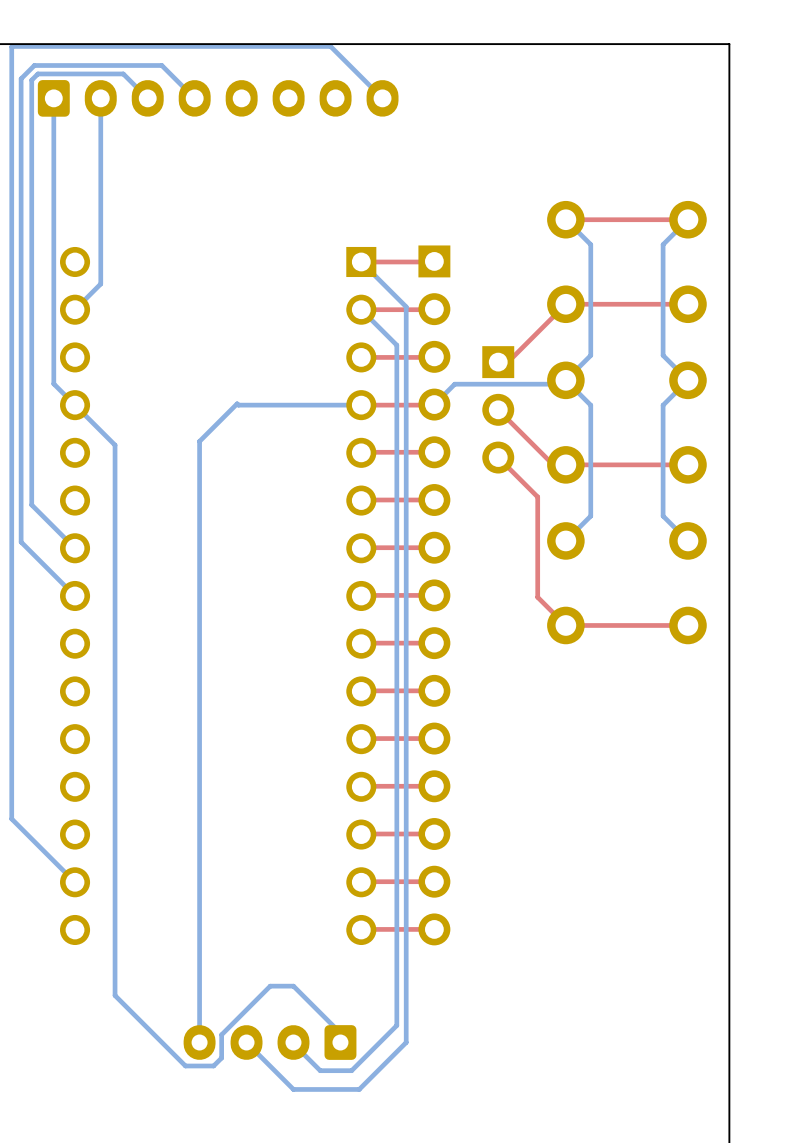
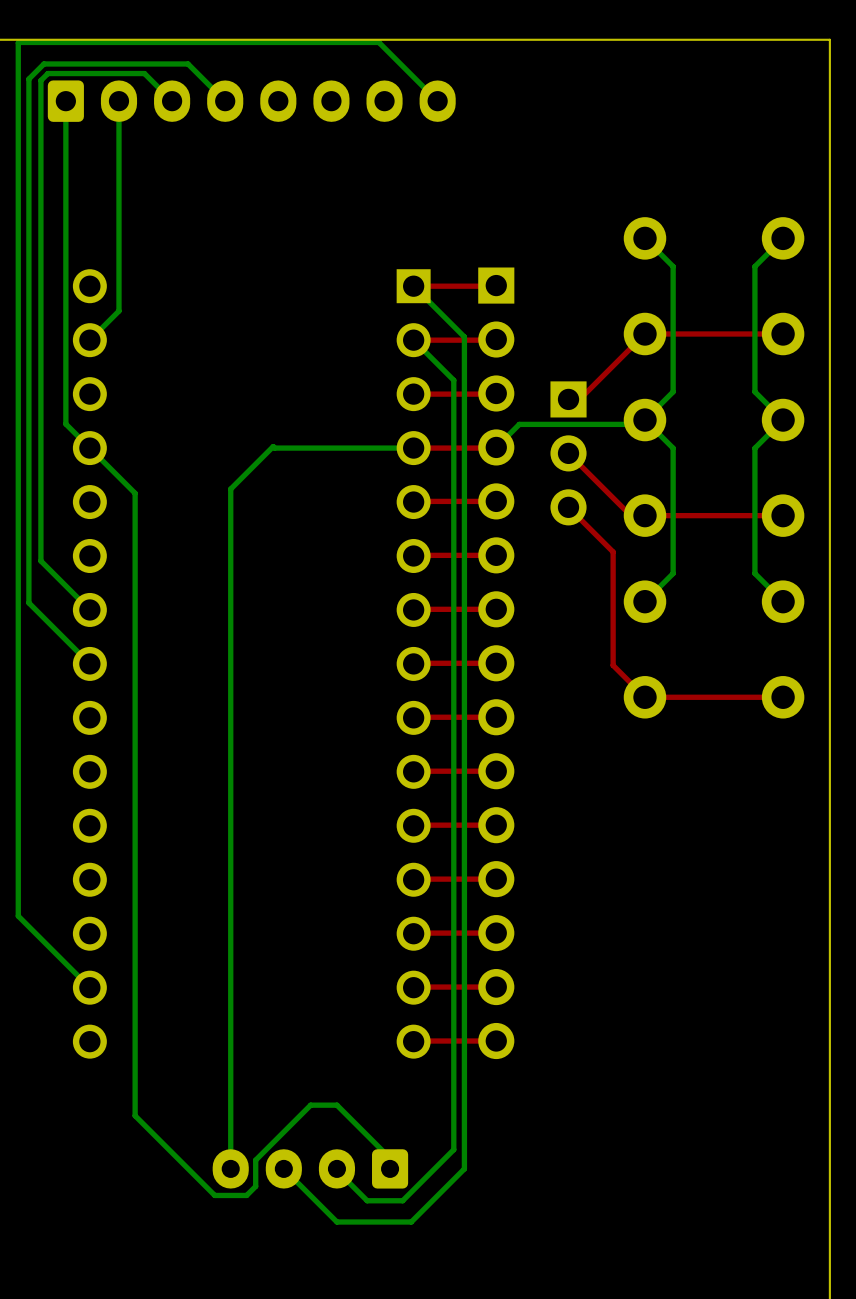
top track: (687, 219) (565, 219) -> none

